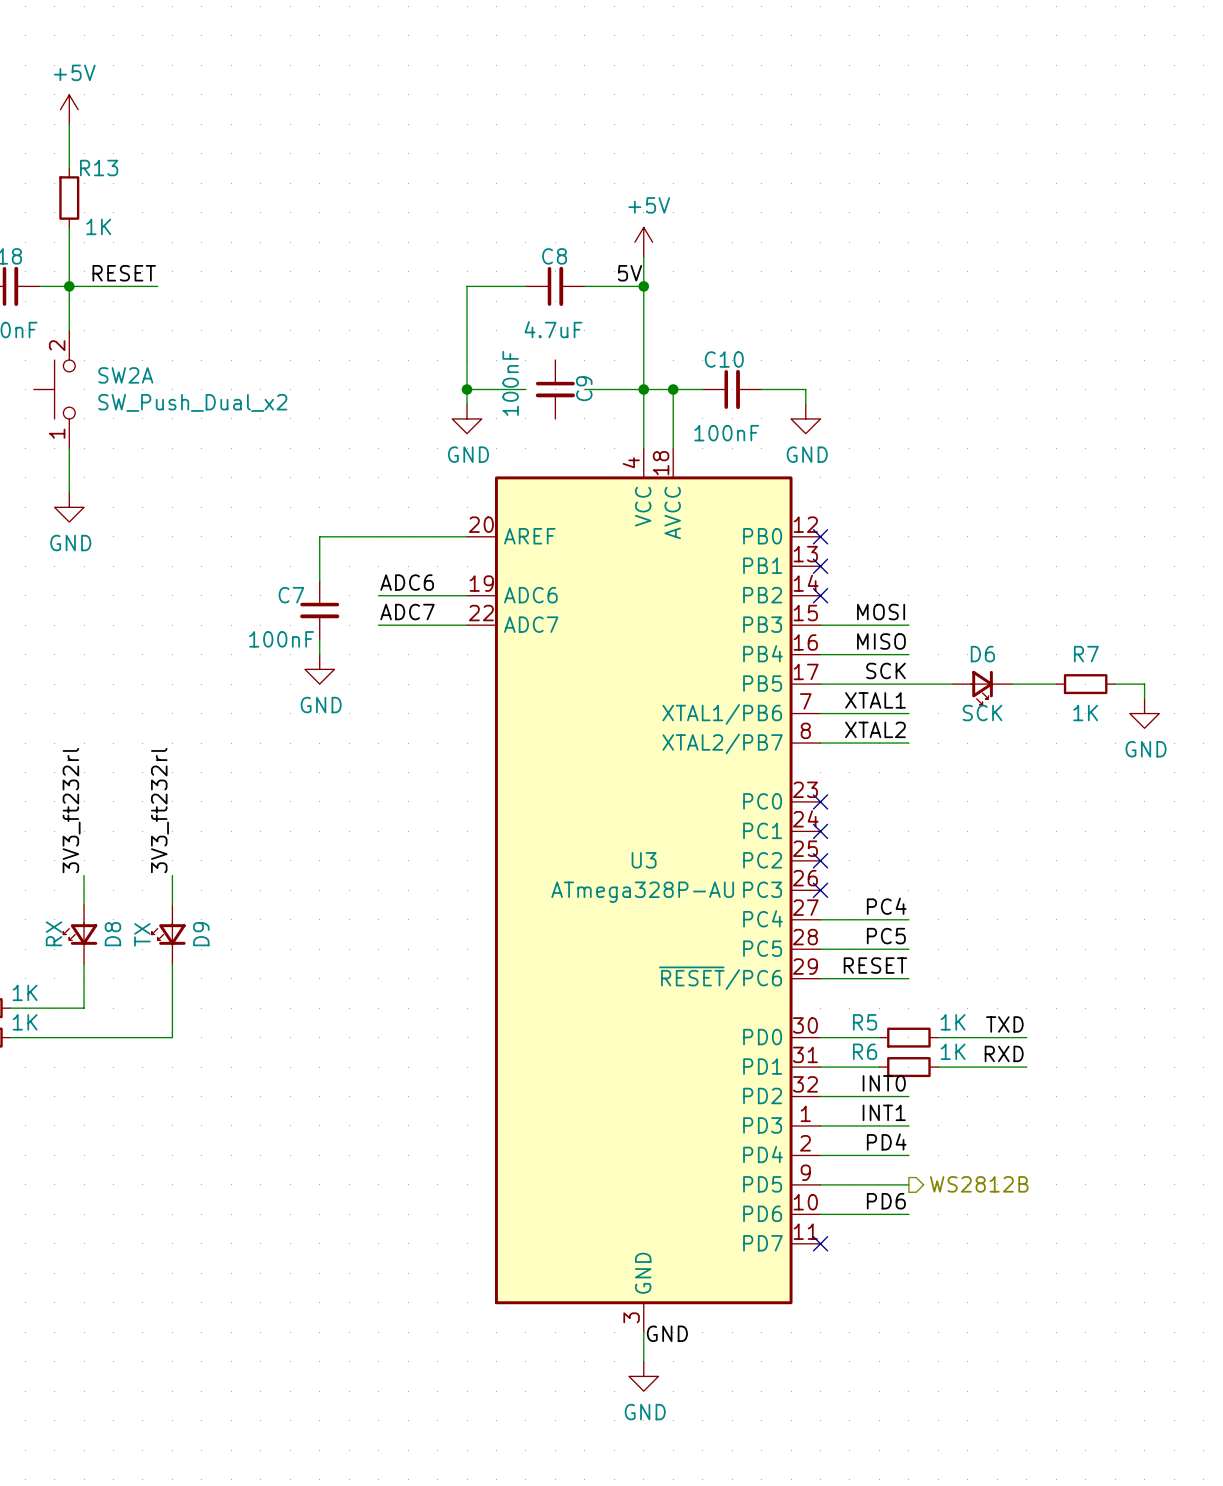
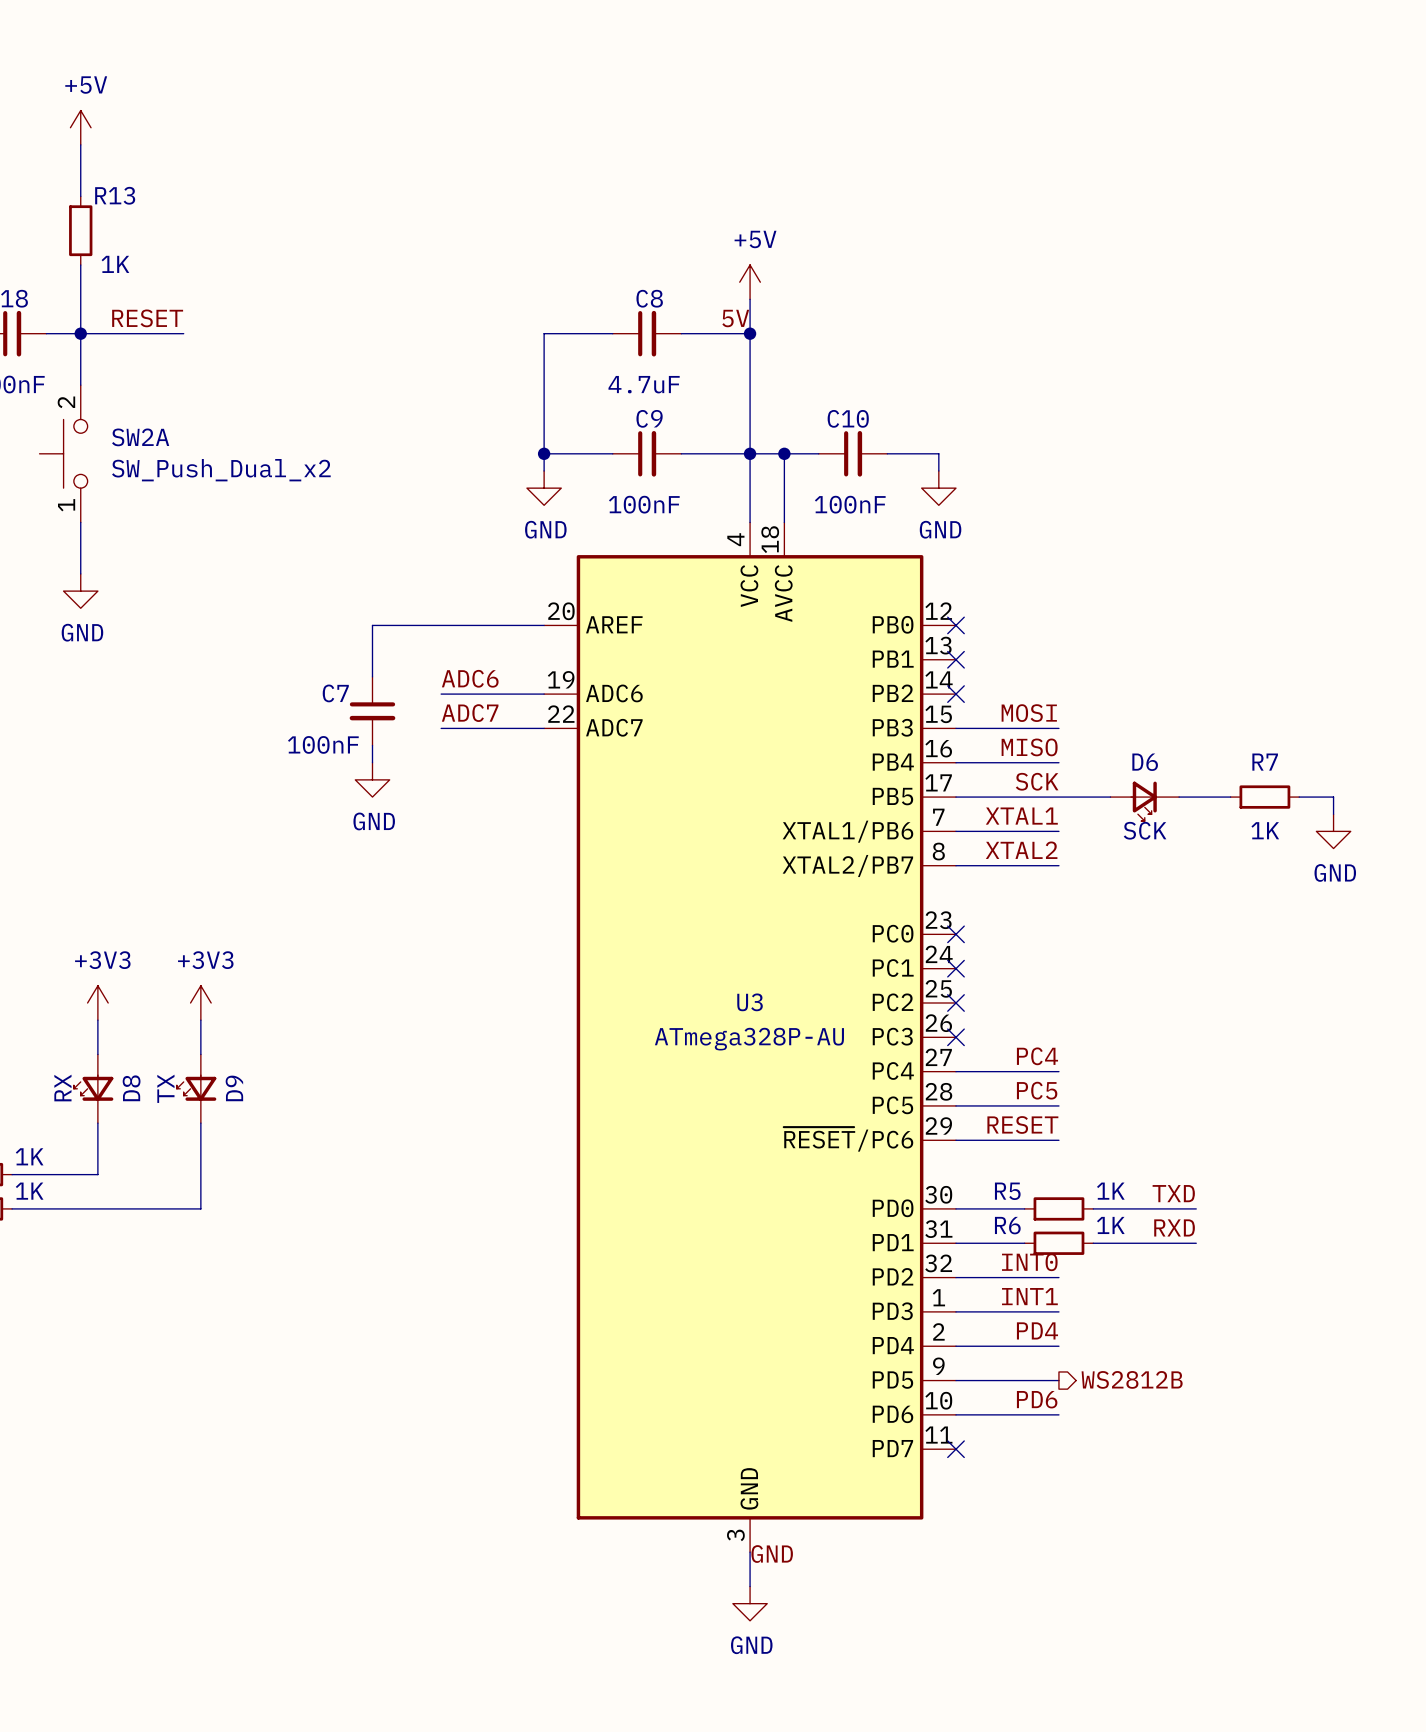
C9 rotation: 0° (555, 389) -> 90° counterclockwise (647, 453)
label: 3V3_ft232rl (71, 810) -> none
label: 3V3_ft232rl (159, 810) -> none
power symbol: none -> +3V3 (97, 1002)
power symbol: none -> +3V3 (200, 1002)

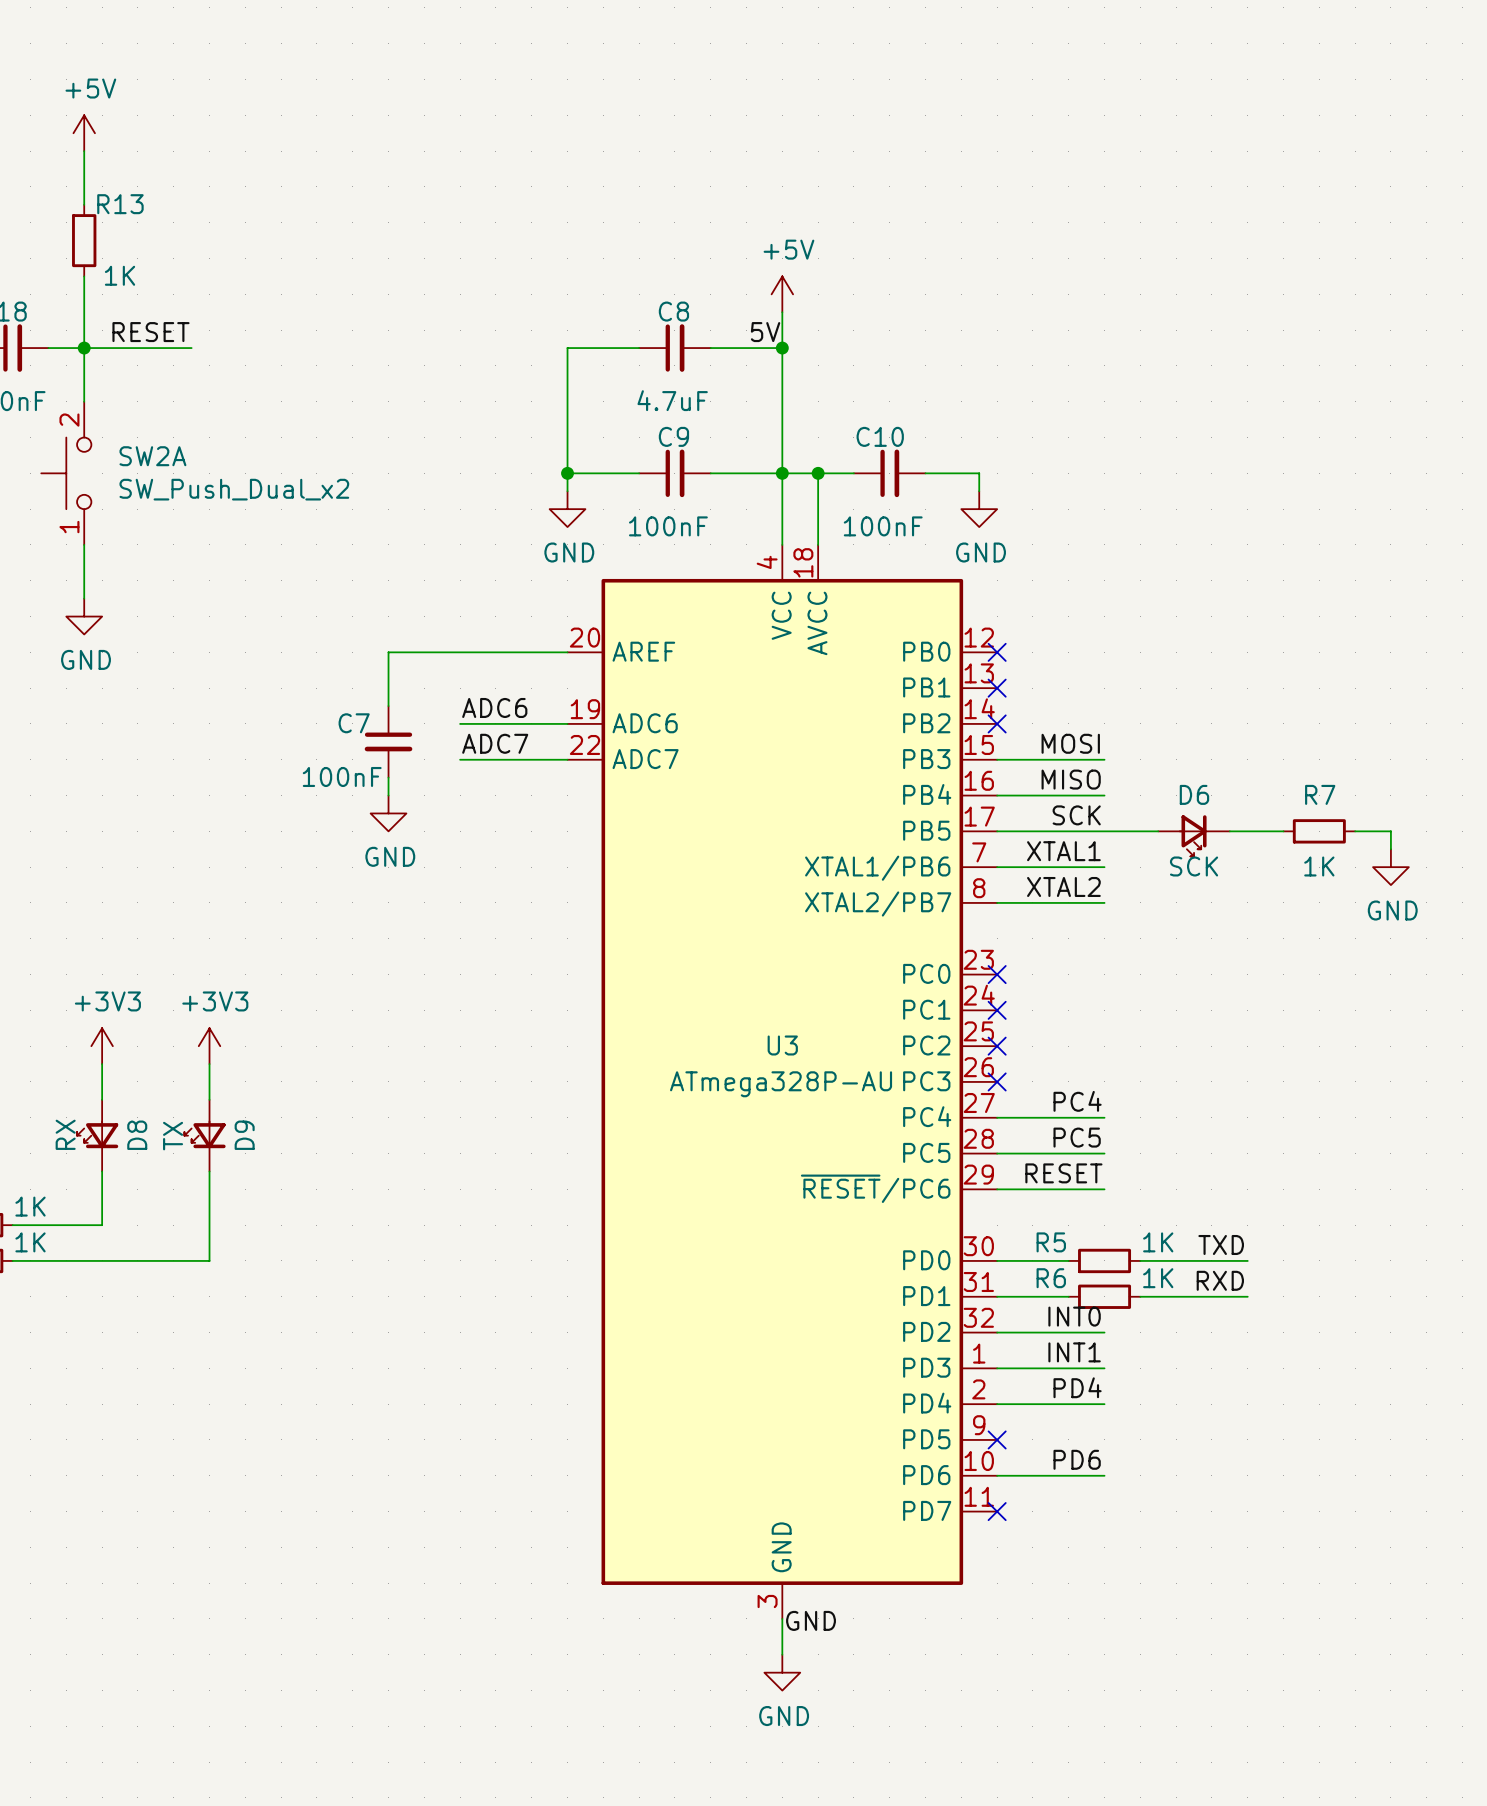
hierarchical label: WS2812B (1132, 1379) -> none
wire: (955, 1380) (1058, 1380) -> none
no-connect mark: none -> (997, 1439)

